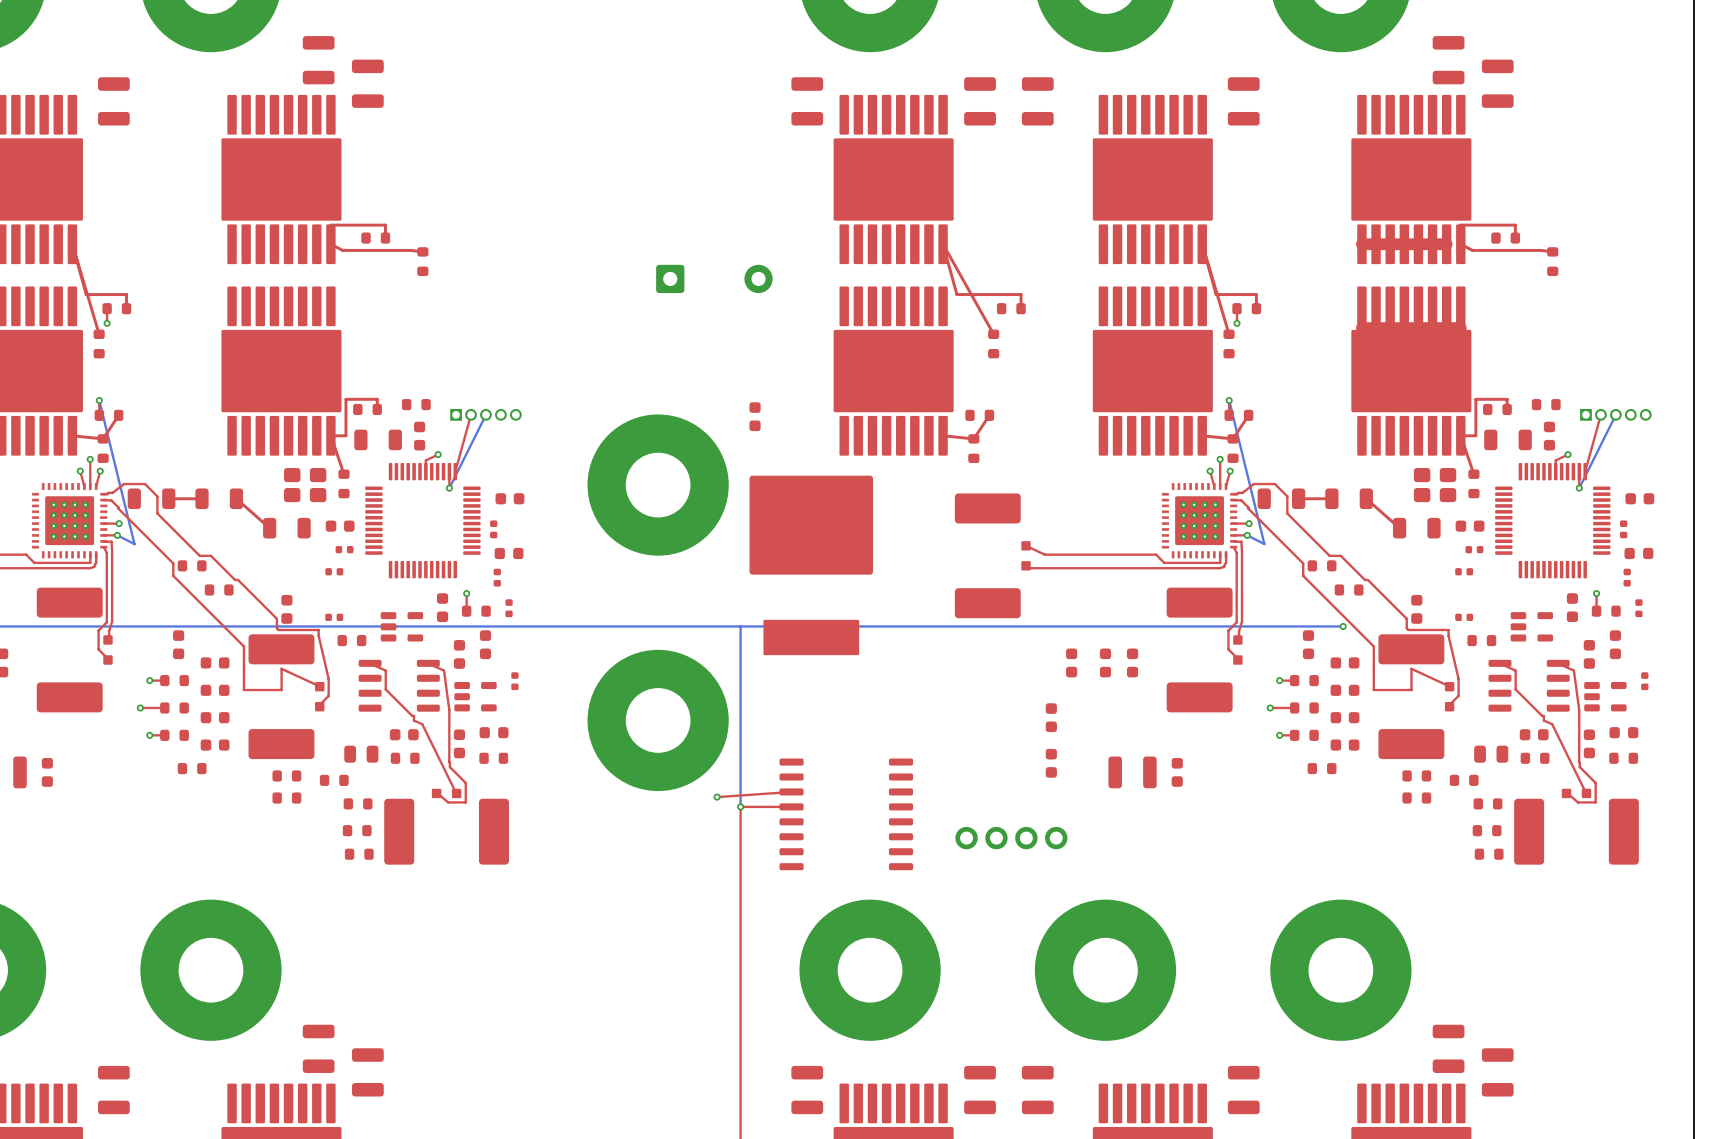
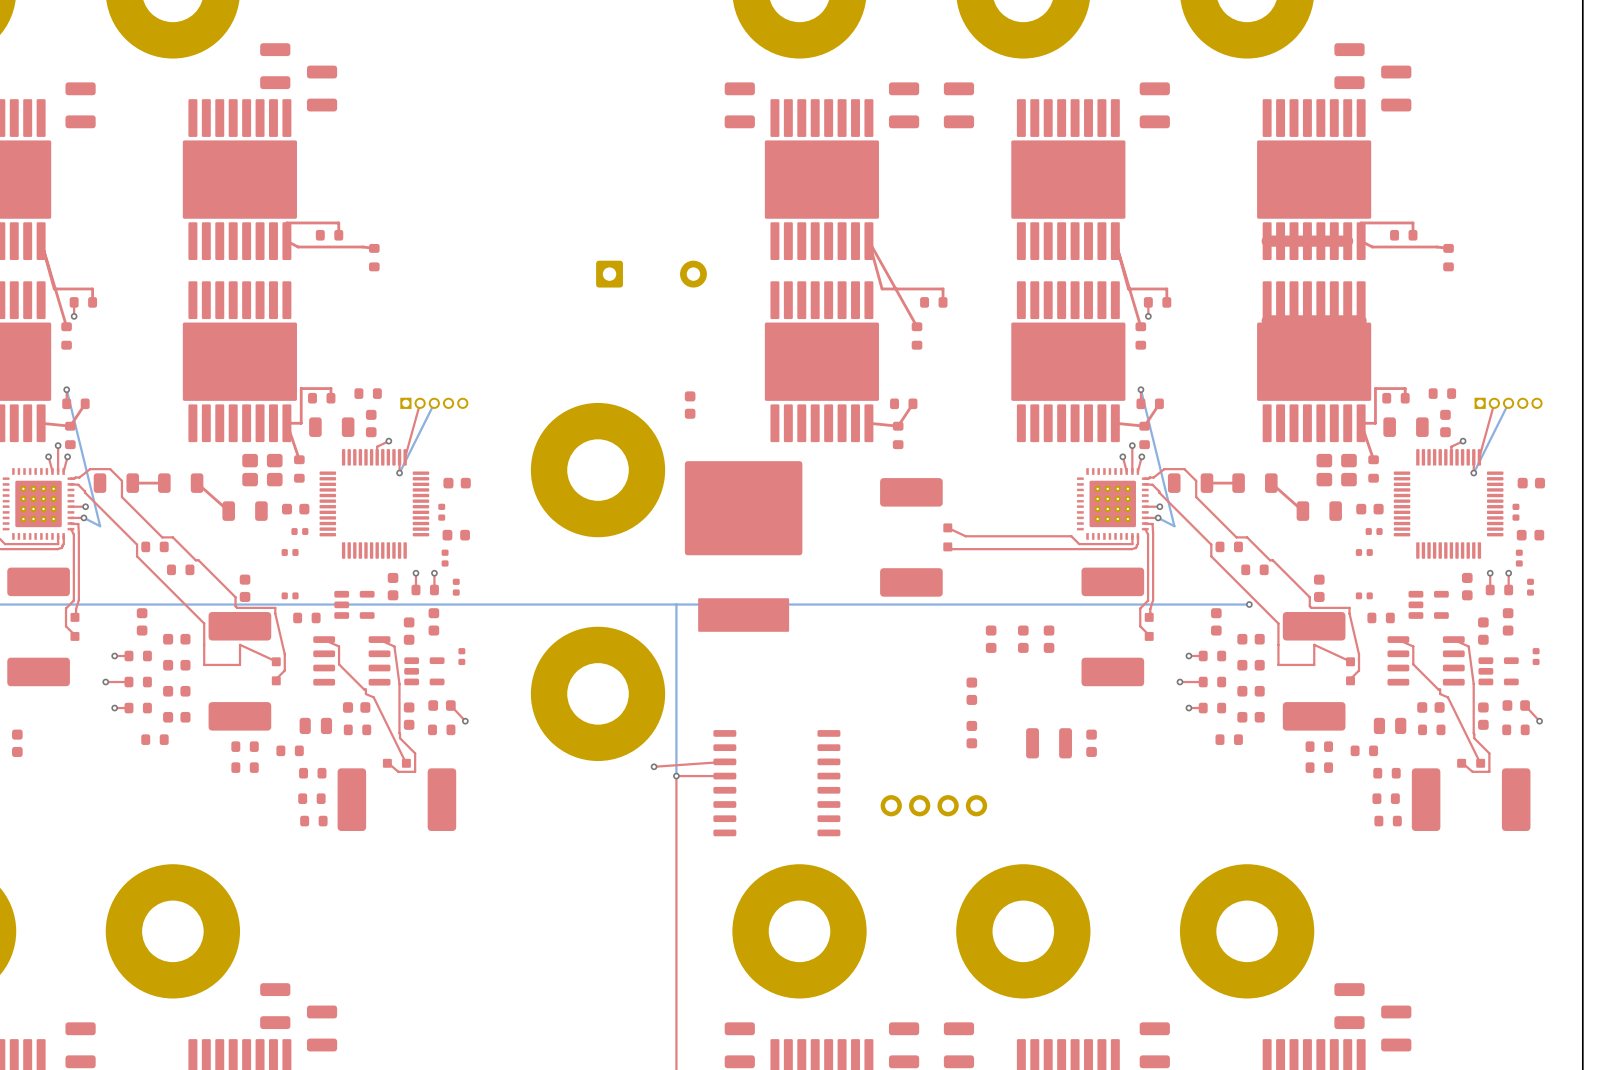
top track: none -> (434, 573) (434, 589)
via: none -> (434, 573)
top track: none -> (1508, 573) (1508, 589)
via: none -> (1508, 573)
top track: none -> (450, 705) (465, 721)
top track: none -> (1525, 705) (1539, 721)
via: none -> (465, 721)
via: none -> (1539, 721)

